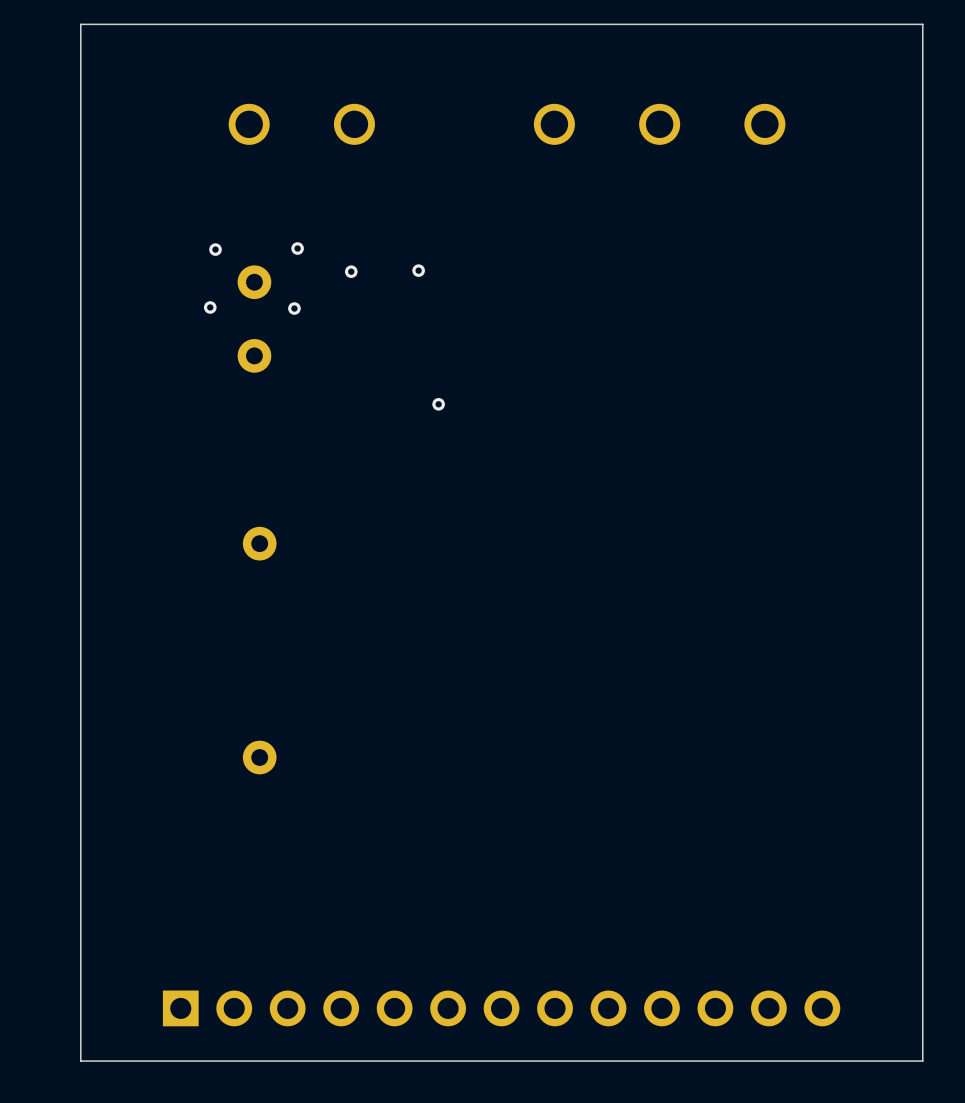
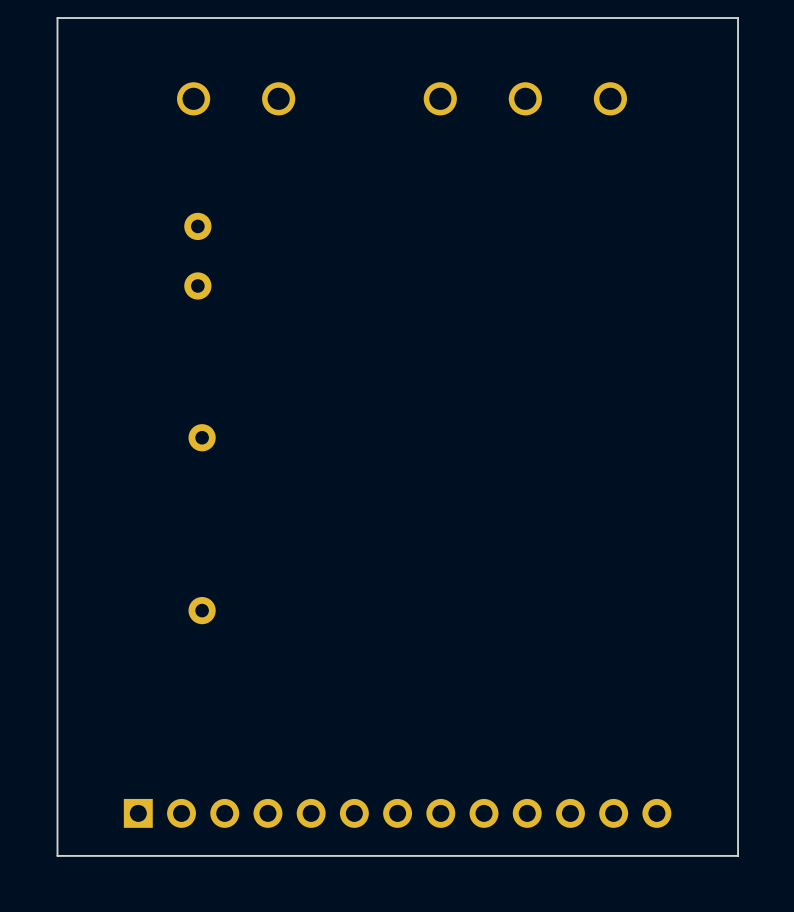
via: (297, 248) -> none
via: (215, 249) -> none
via: (418, 270) -> none
via: (351, 271) -> none
via: (210, 307) -> none
via: (294, 308) -> none
via: (438, 404) -> none

